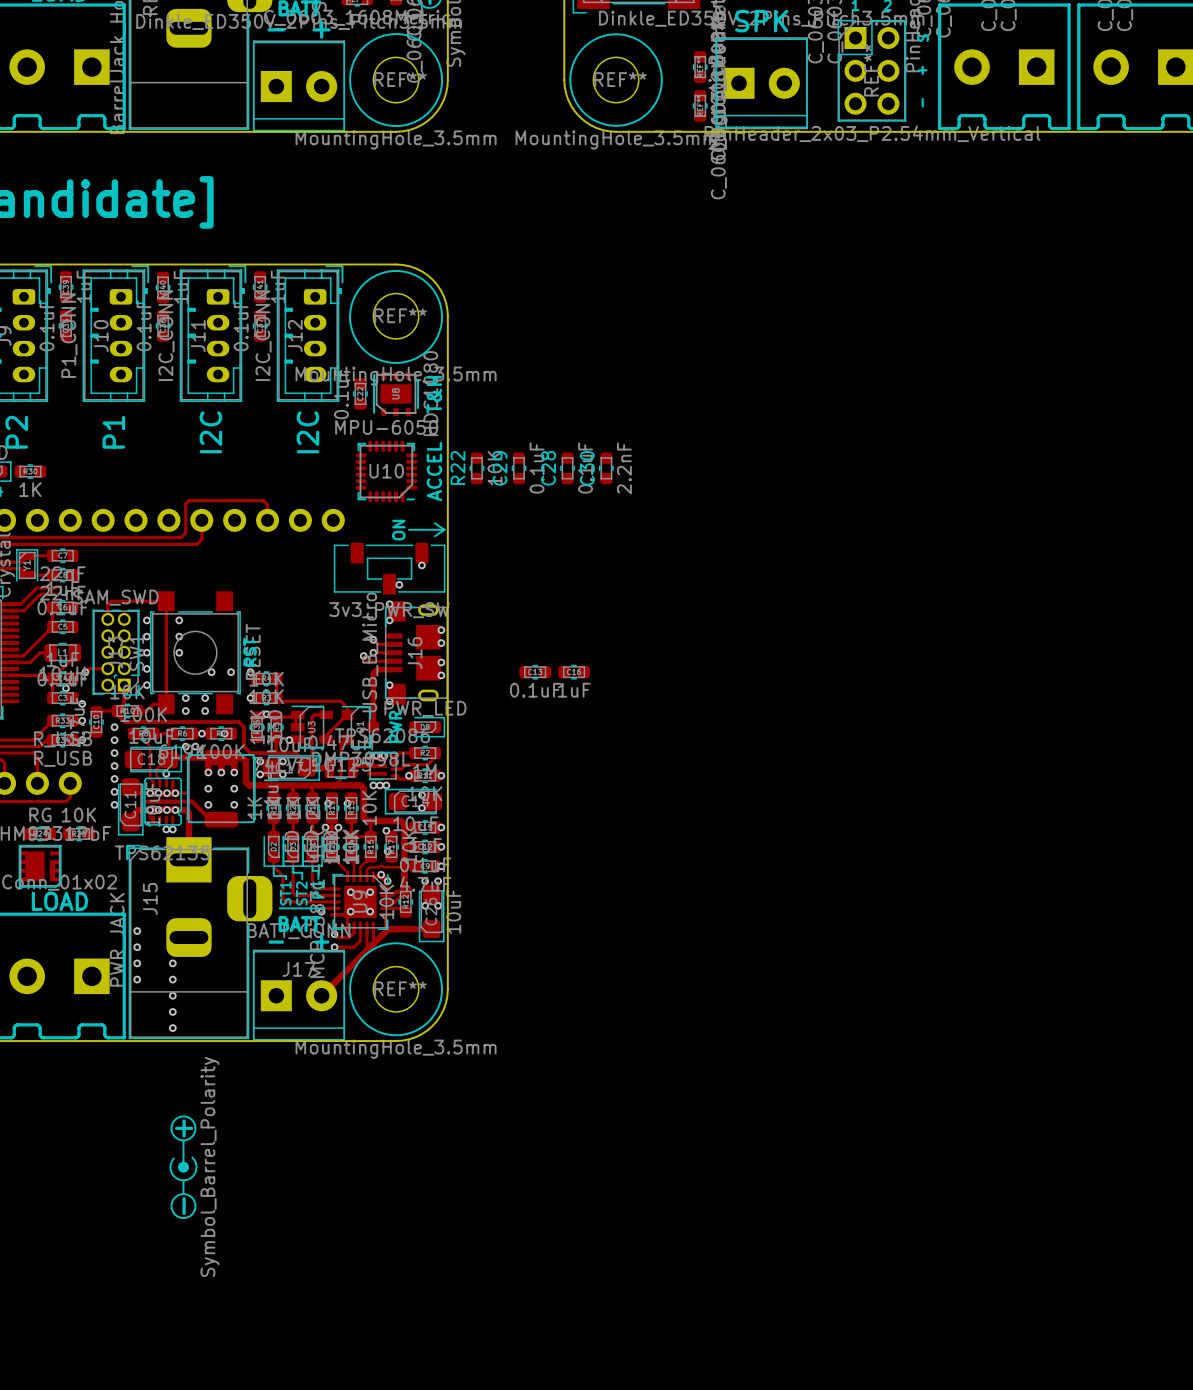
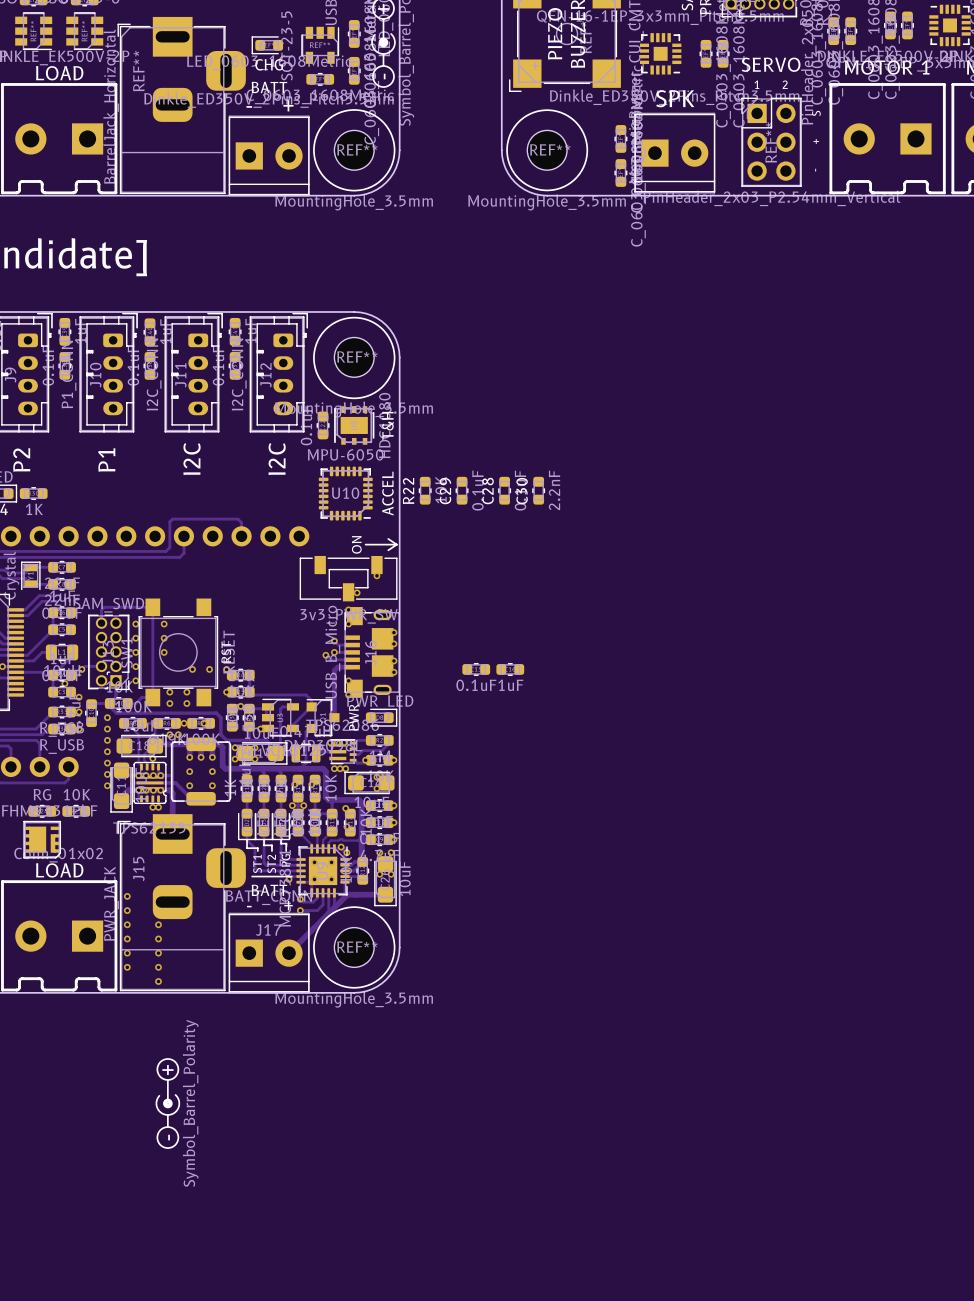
via: none -> (127, 953)
via: none -> (127, 967)

